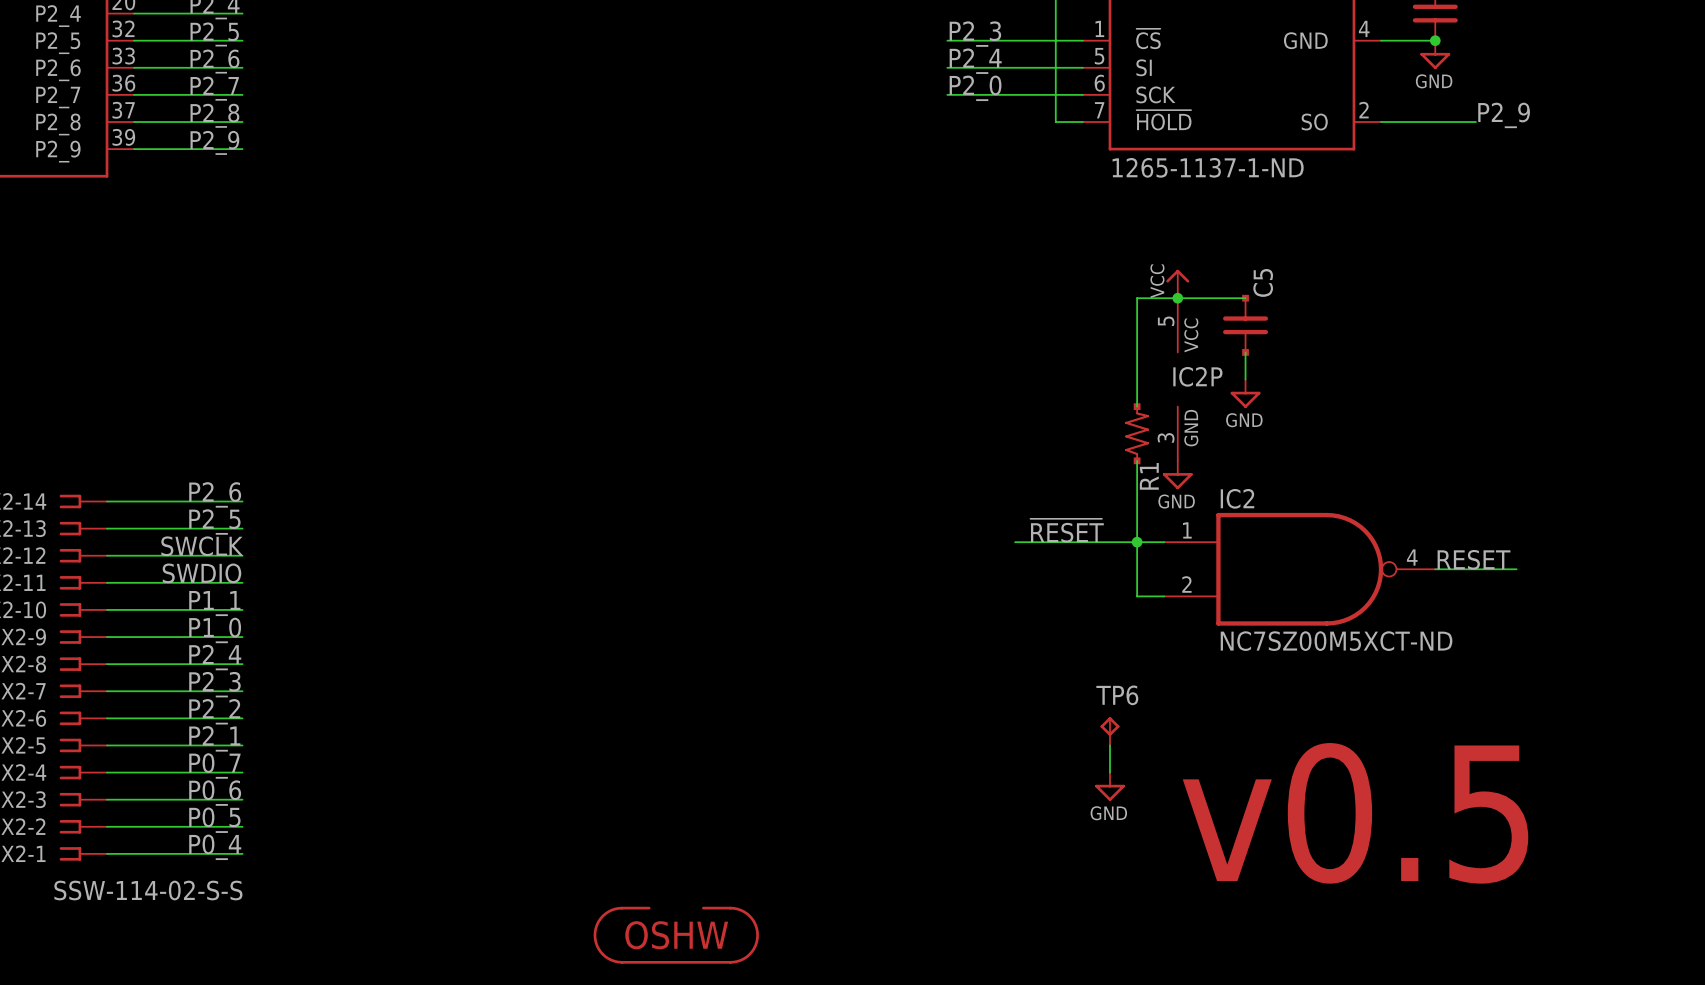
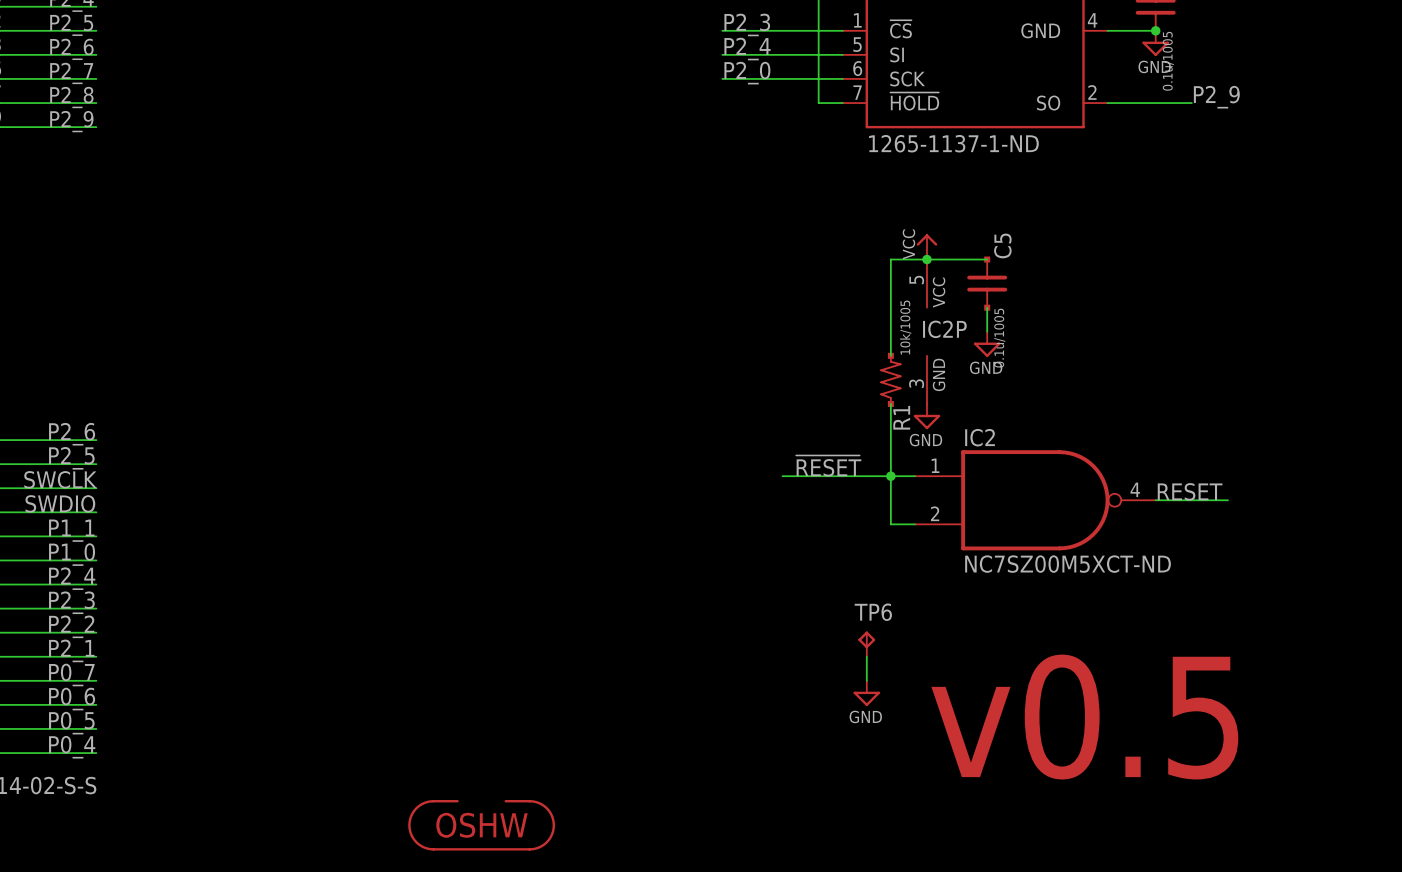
part value: none -> 0.1u/1005 (1168, 61)
R1 value: none -> 10k/1005 (905, 327)
C5 value: none -> 0.1u/1005 (999, 338)

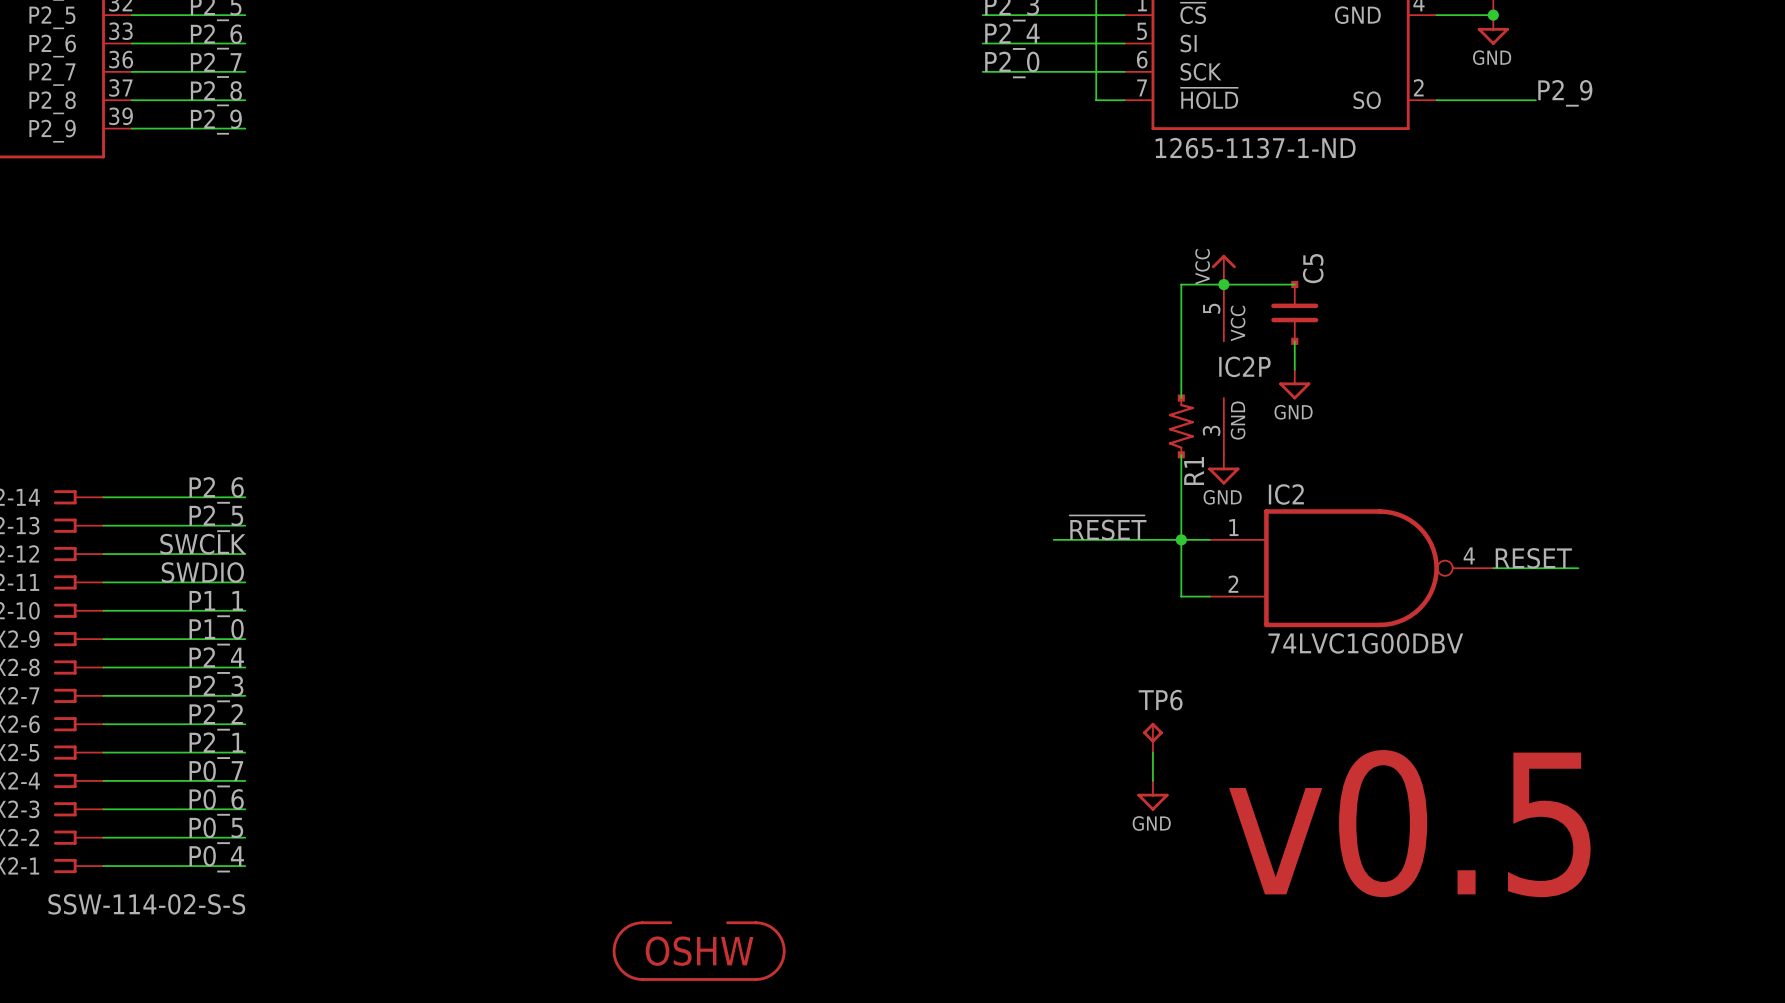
part value: 0.1u/1005 (1168, 61) -> none
R1 value: 10k/1005 (905, 327) -> none
C5 value: 0.1u/1005 (999, 338) -> none
IC2 value: NC7SZ00M5XCT-ND (1068, 564) -> 74LVC1G00DBV (1365, 643)

